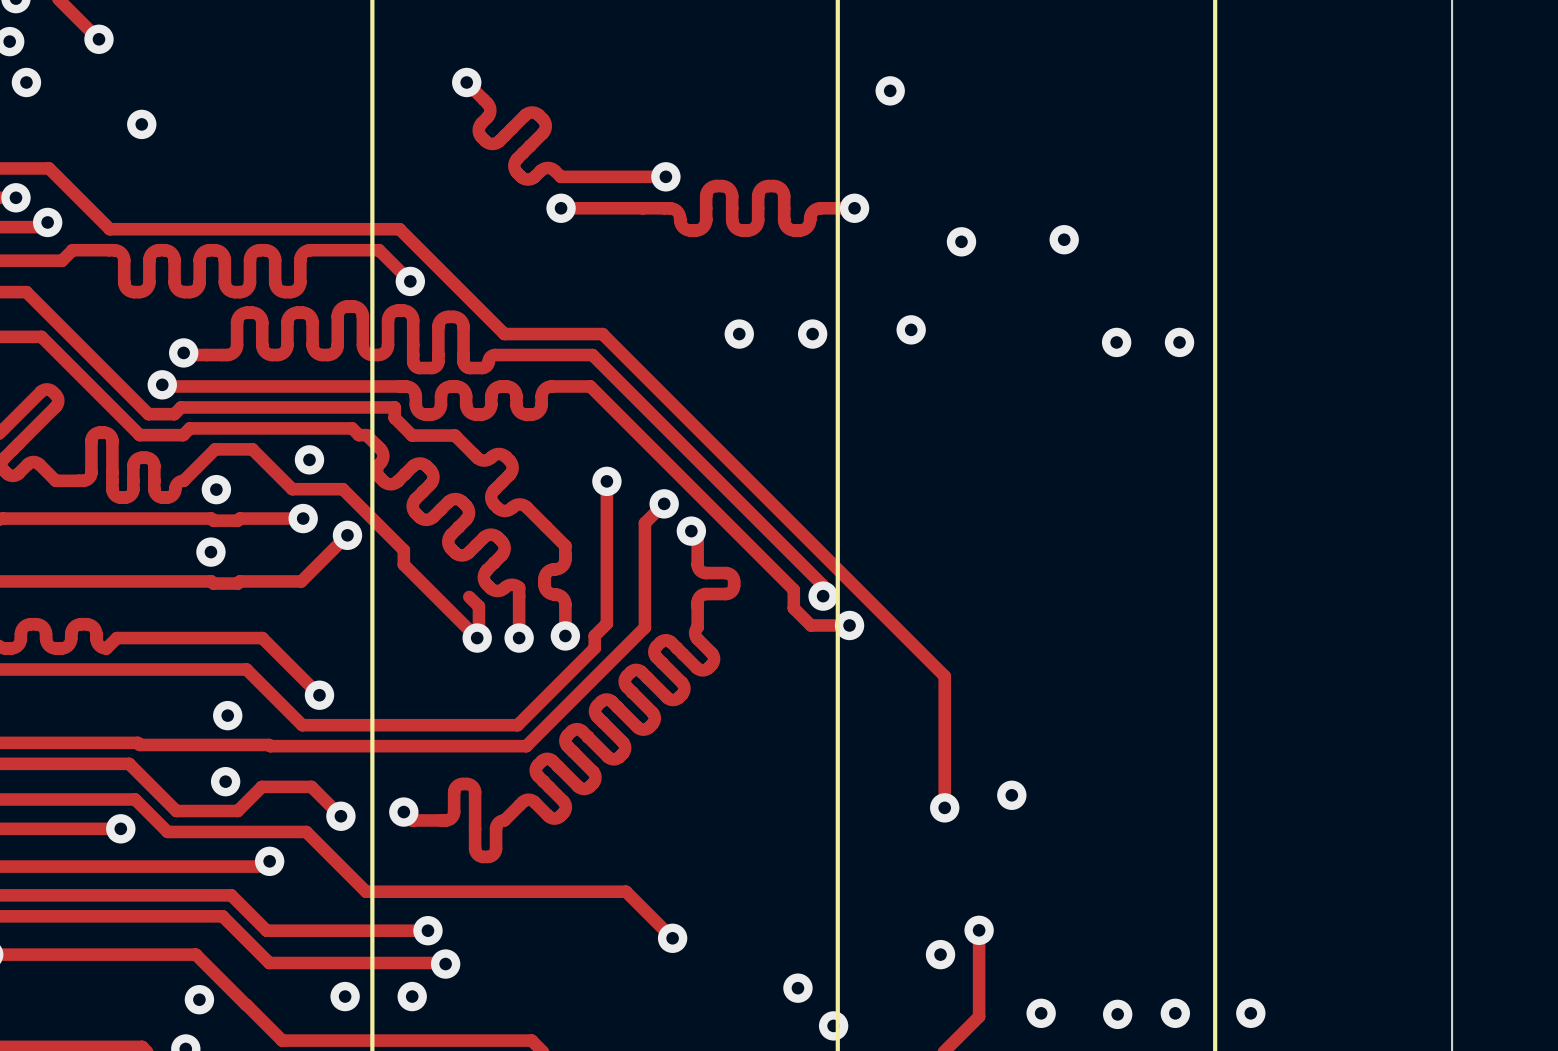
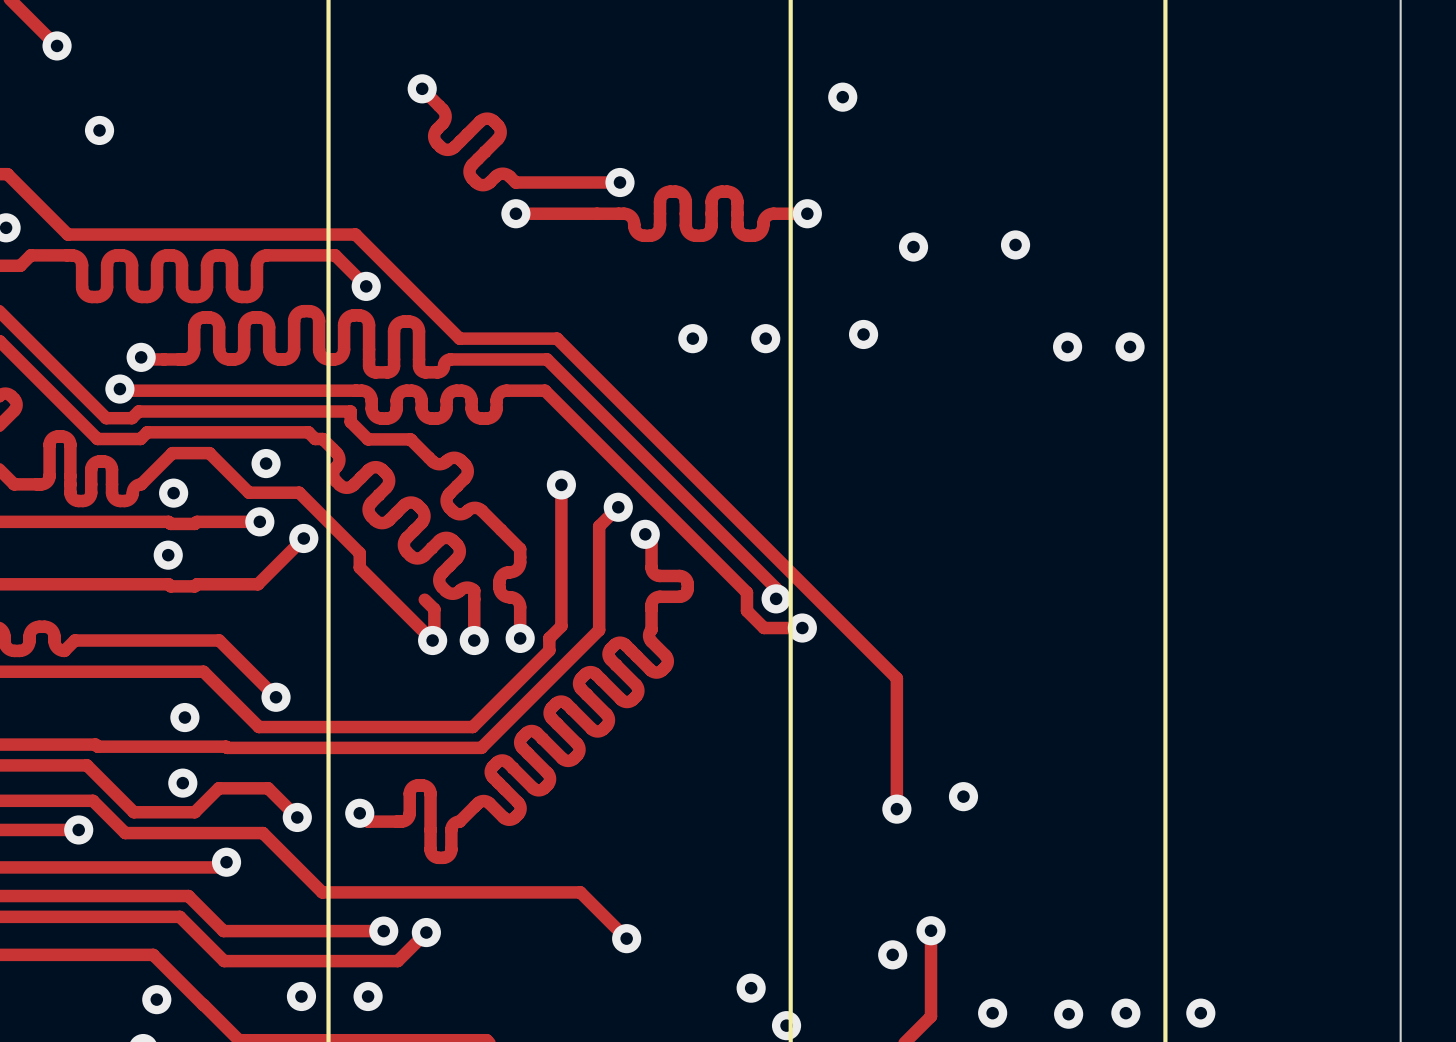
track: (267, 960) (269, 963) (445, 964) -> (224, 961) (397, 961) (426, 932)
via position: (445, 964) -> (426, 932)

